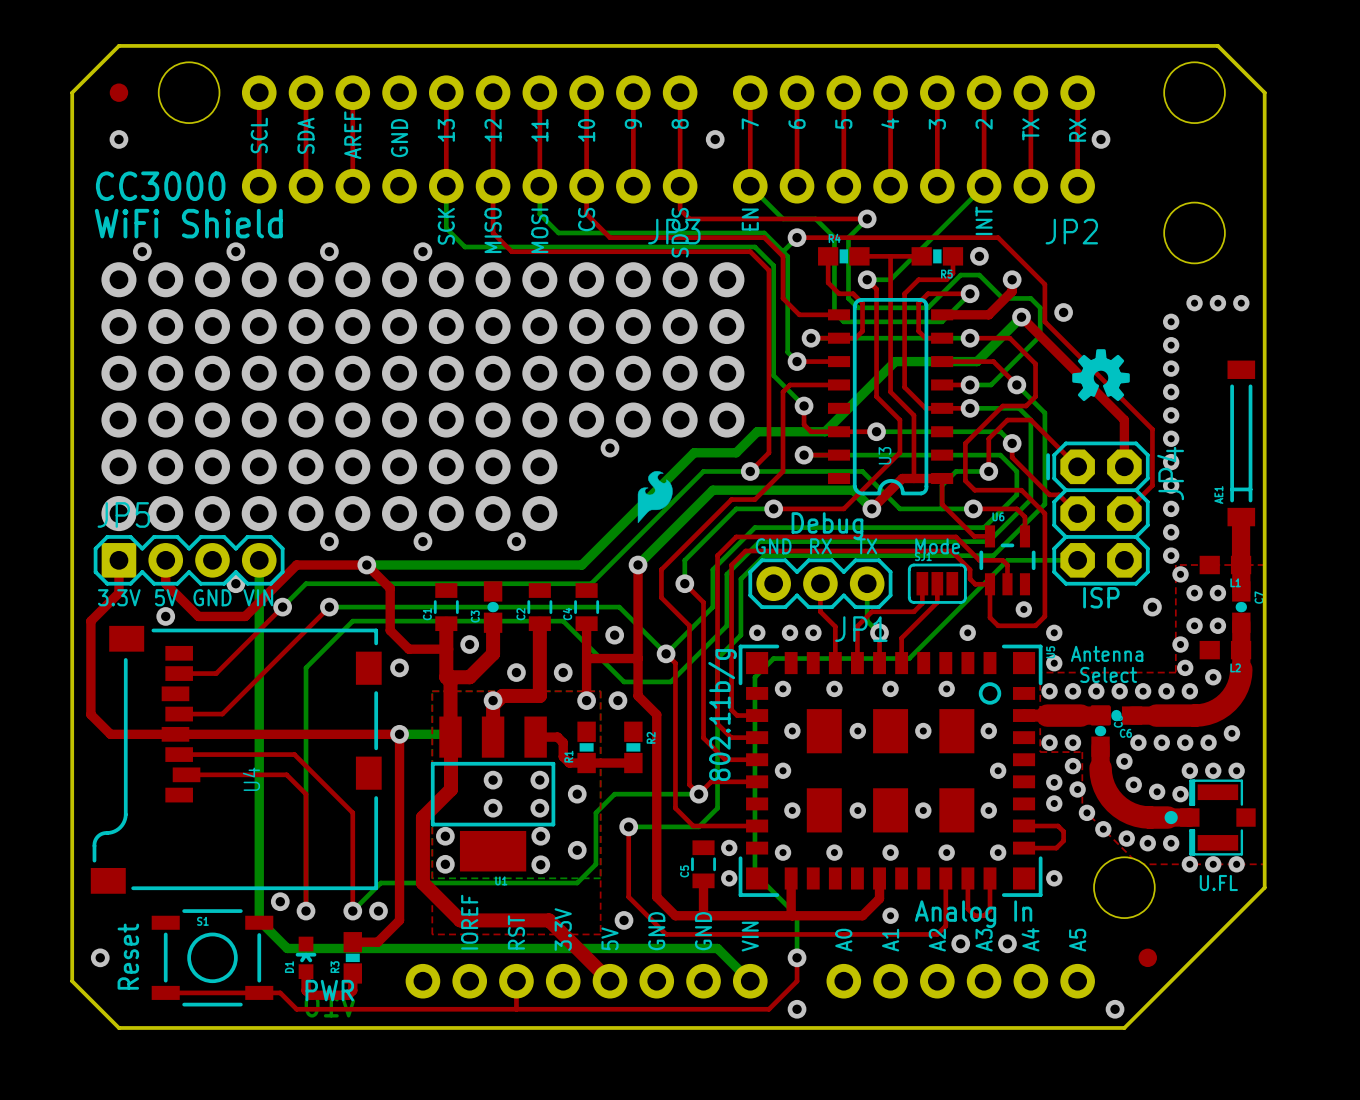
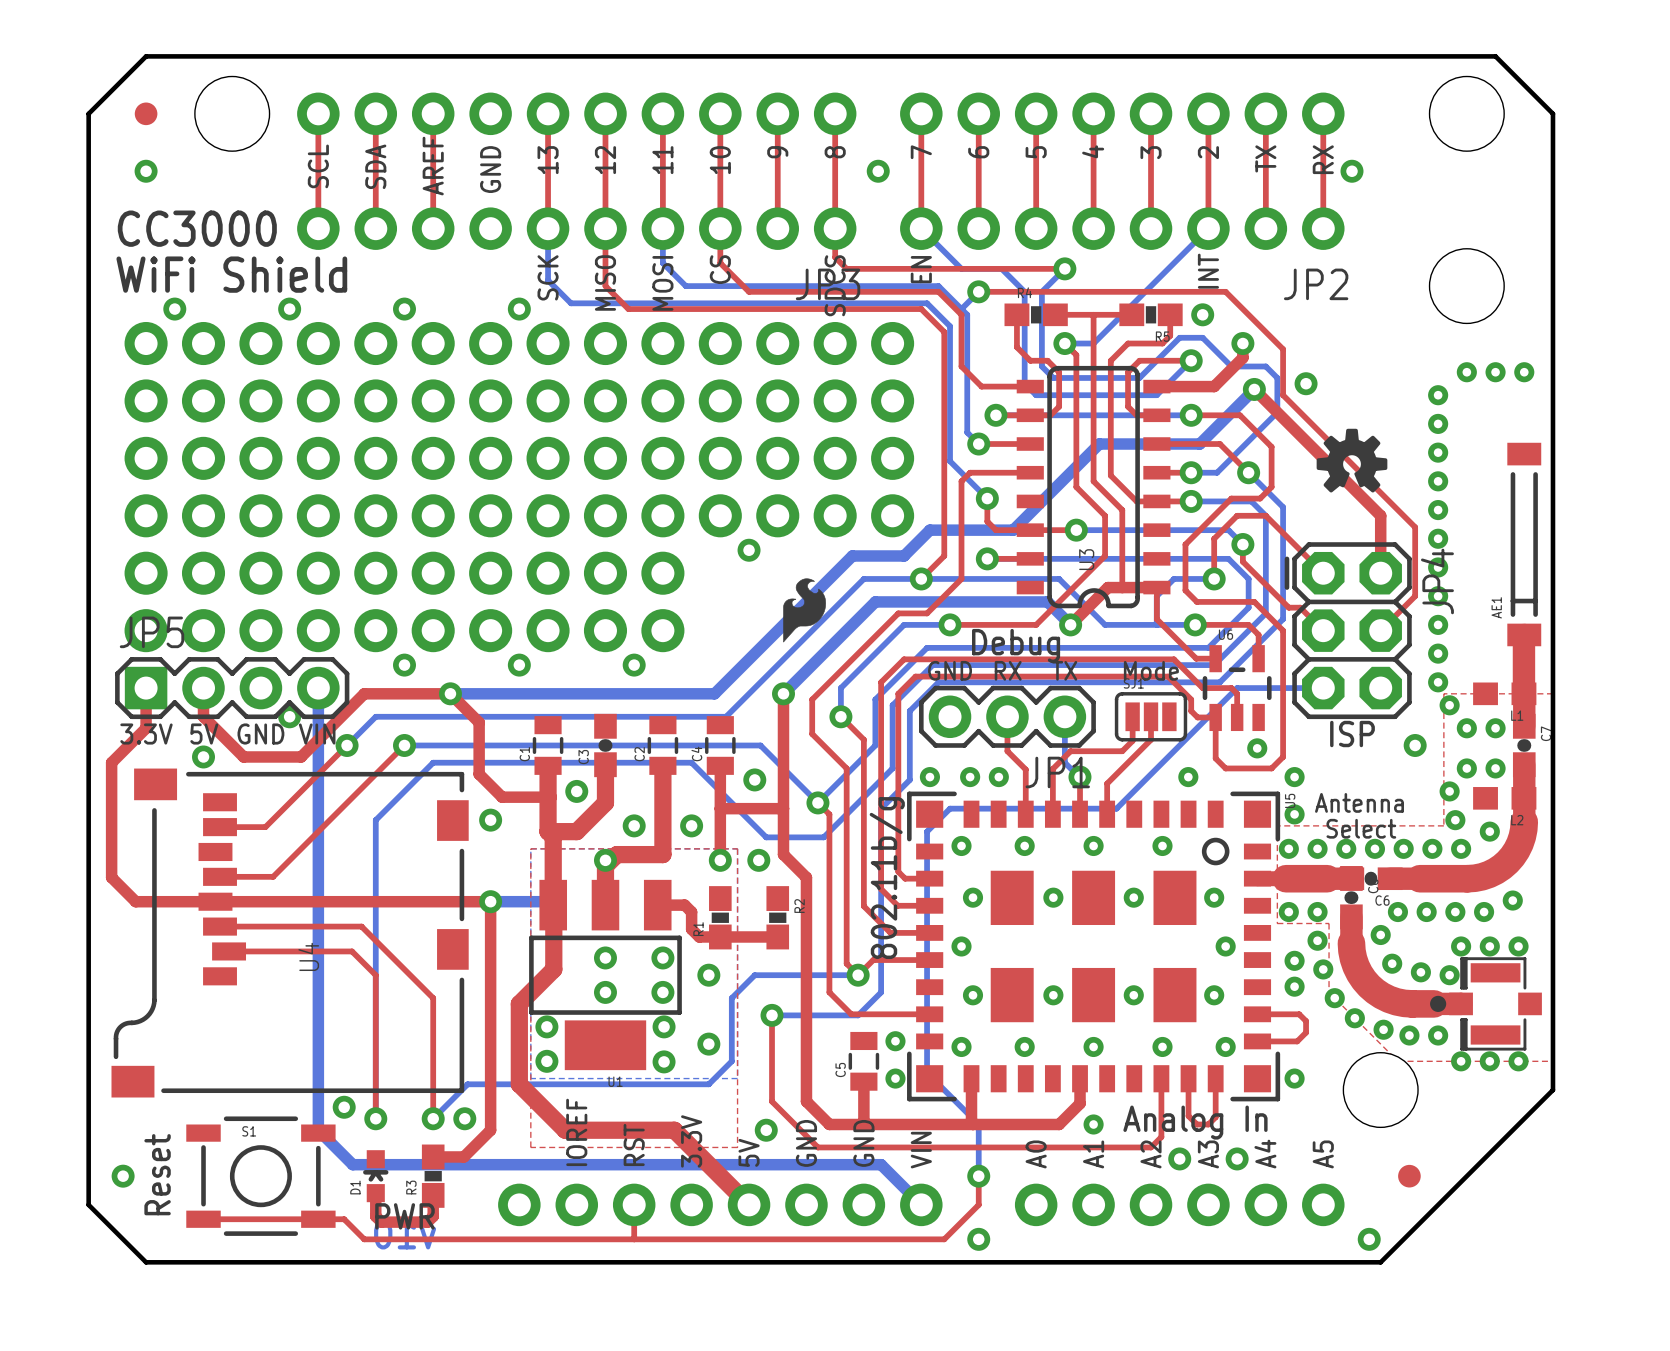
text: U.FL (1218, 883) -> none

